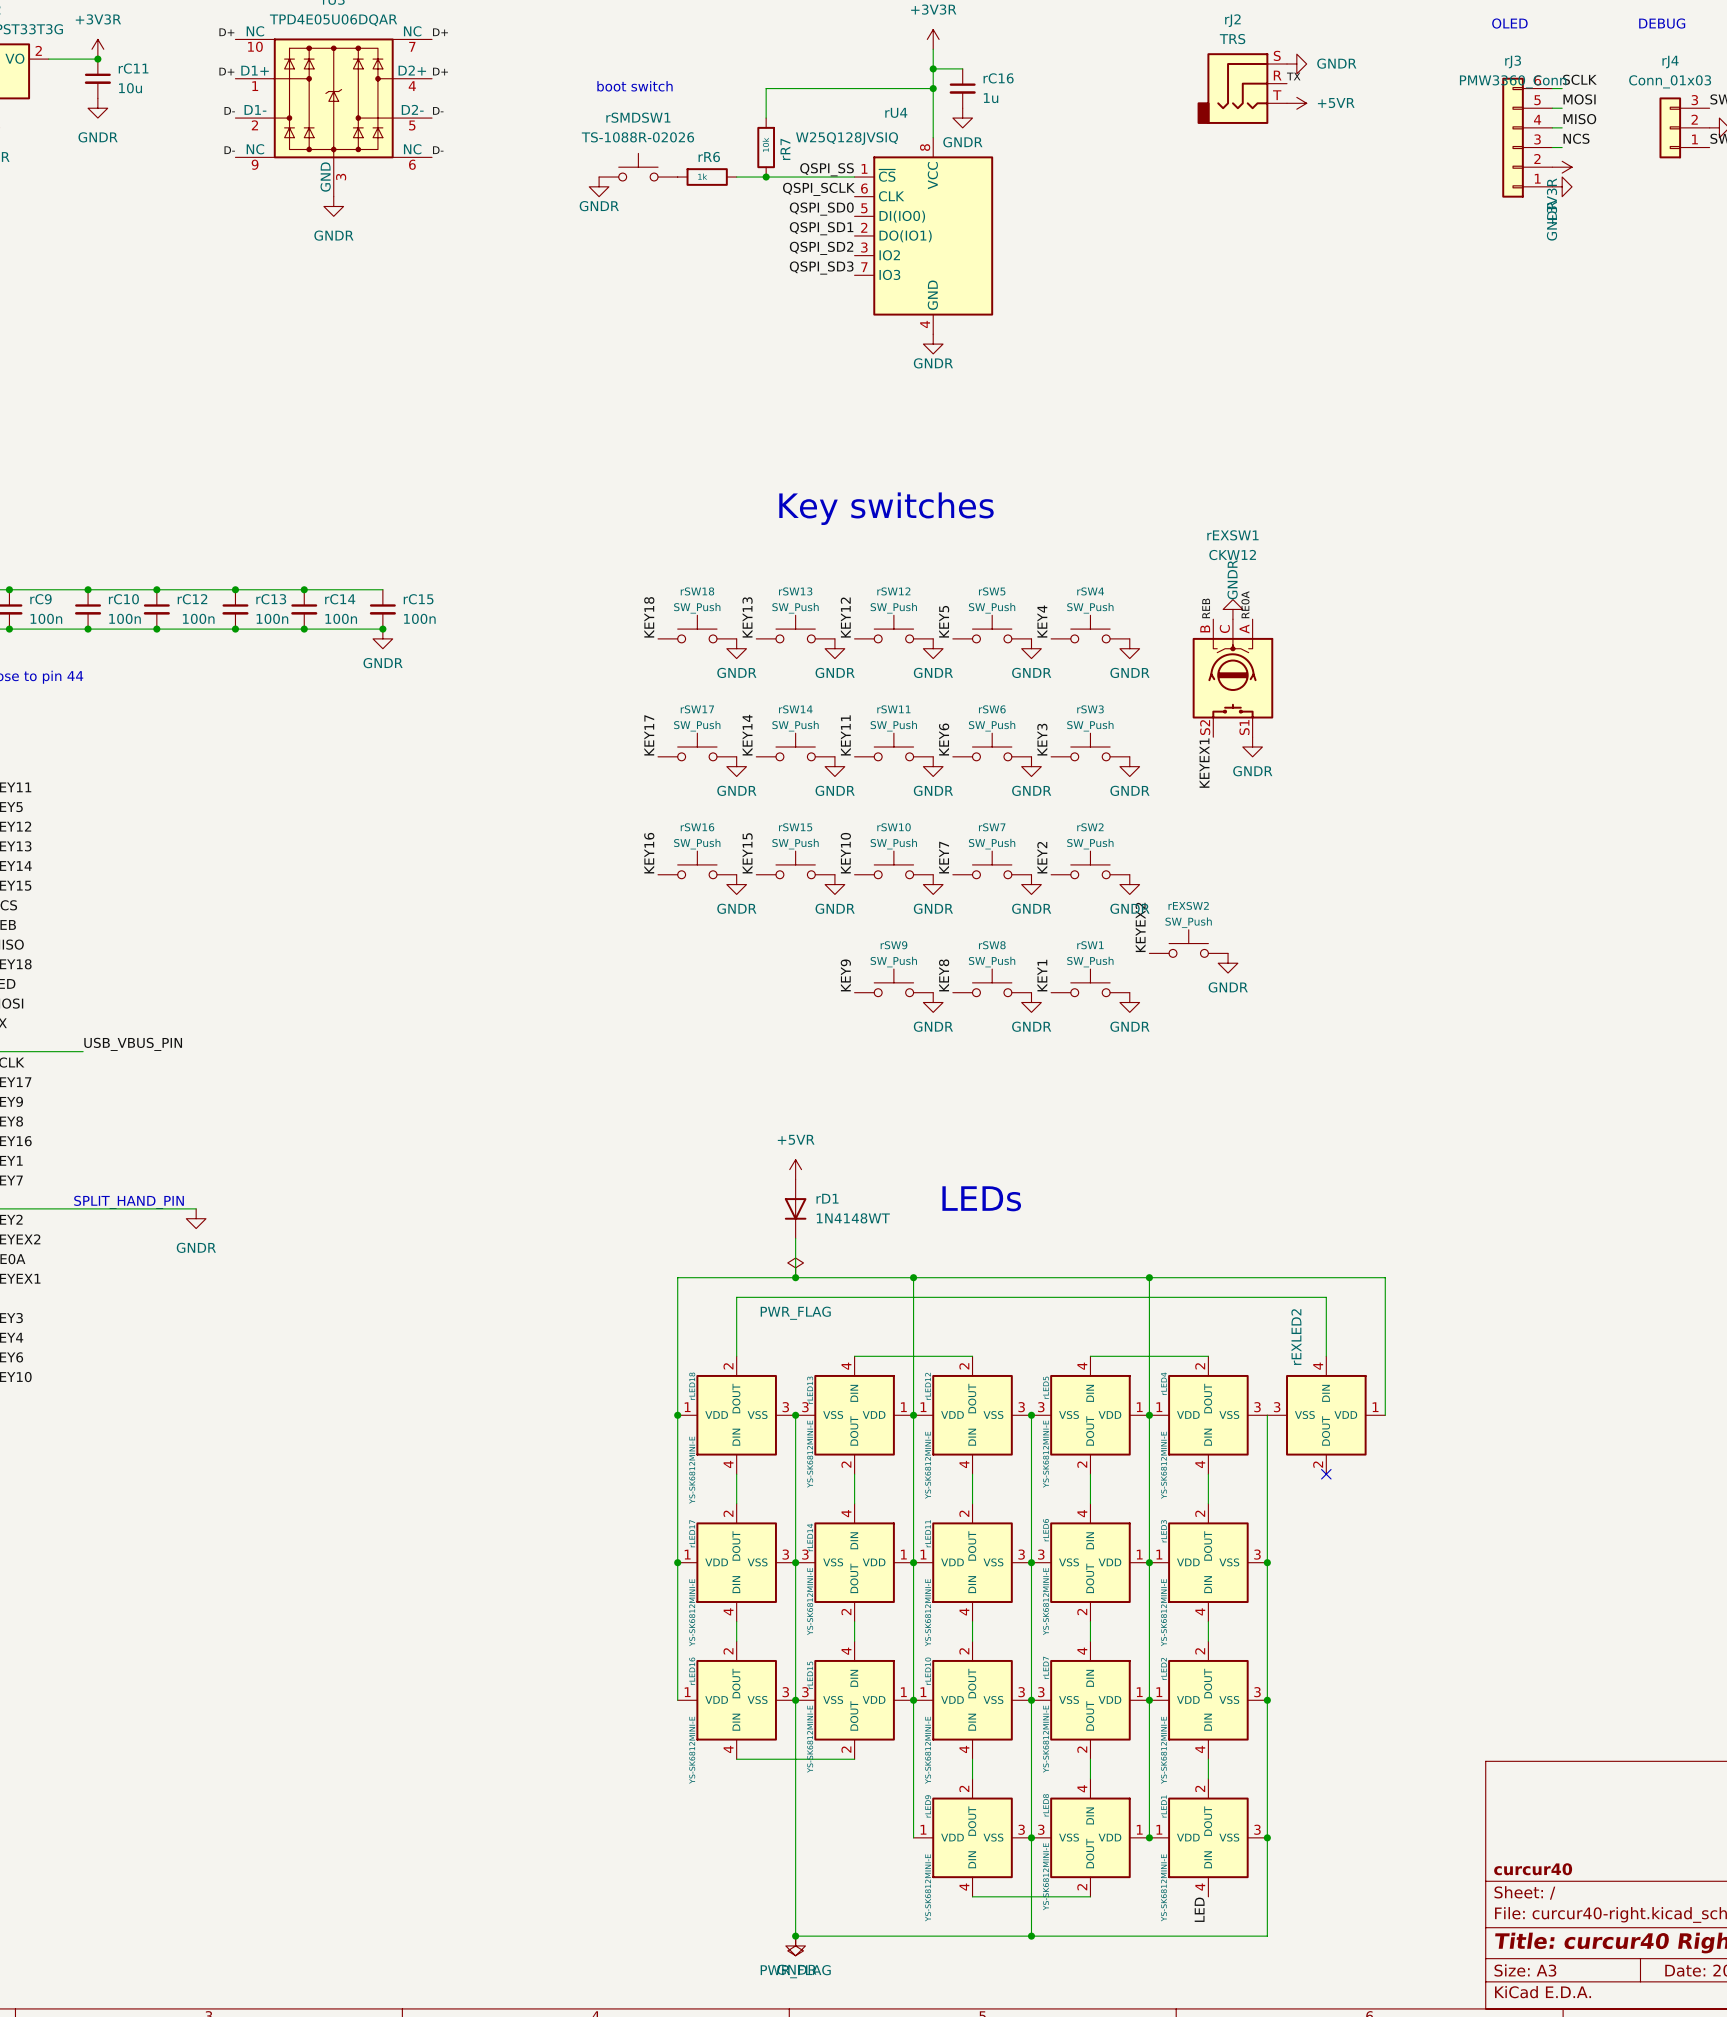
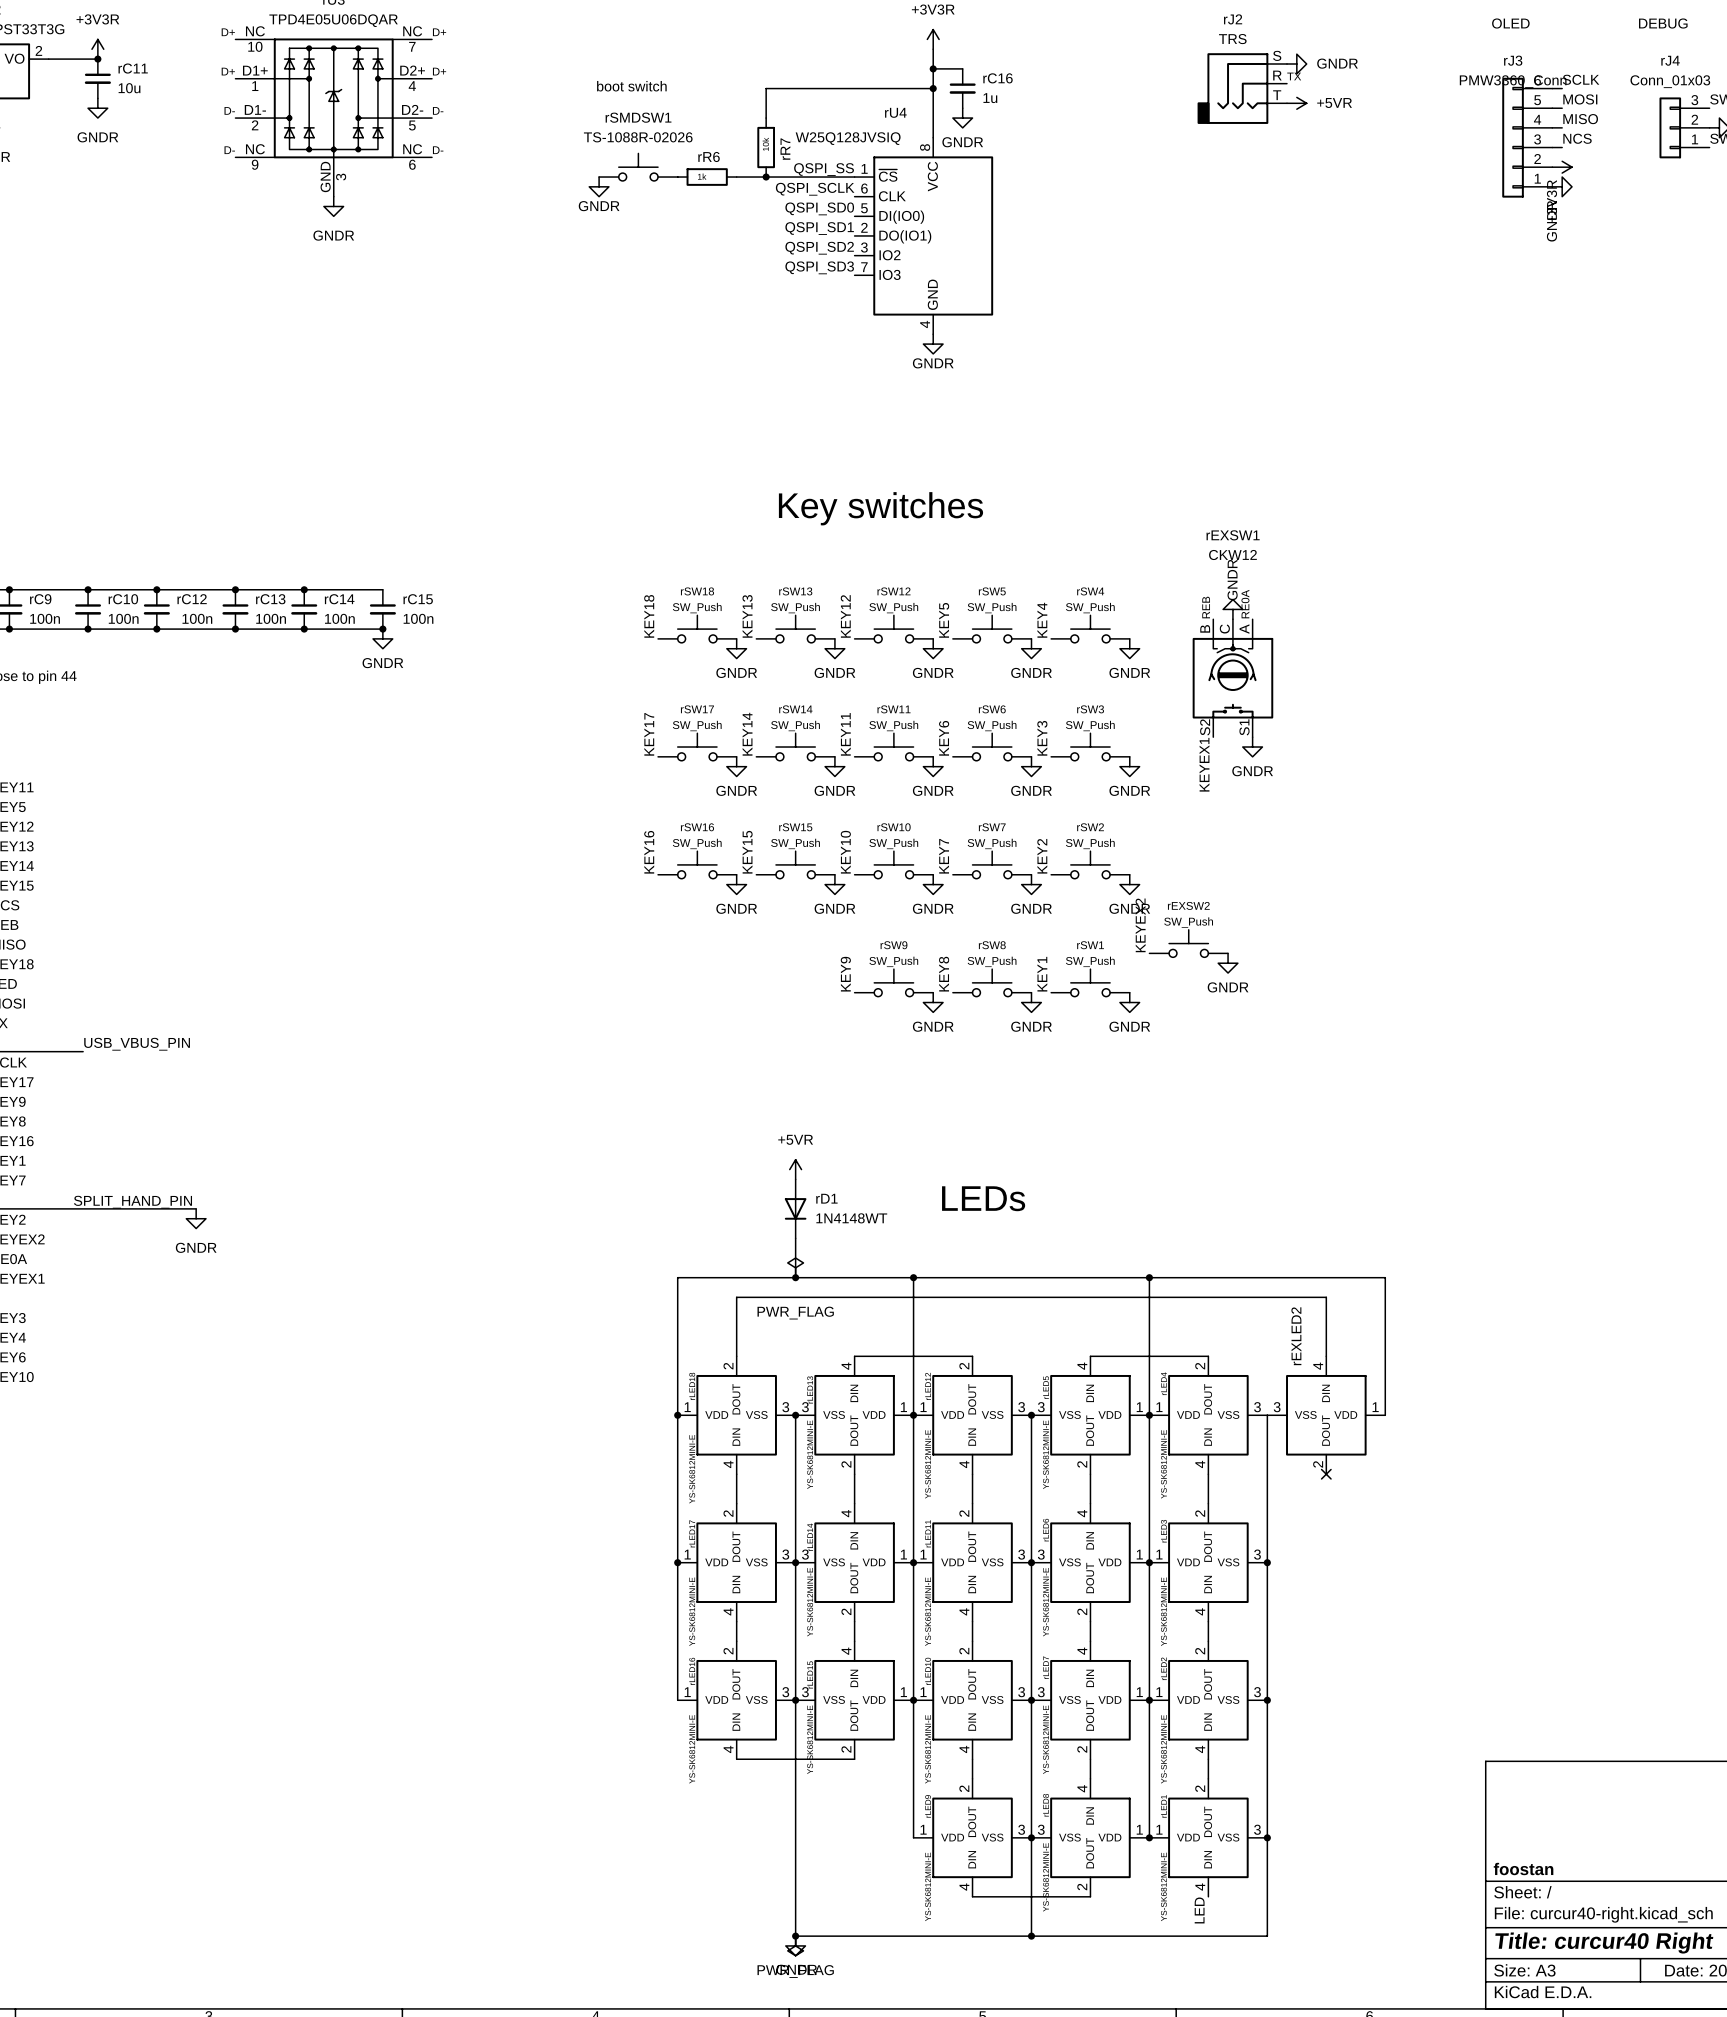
title block: curcur40 (1533, 1869) -> foostan (1523, 1869)

